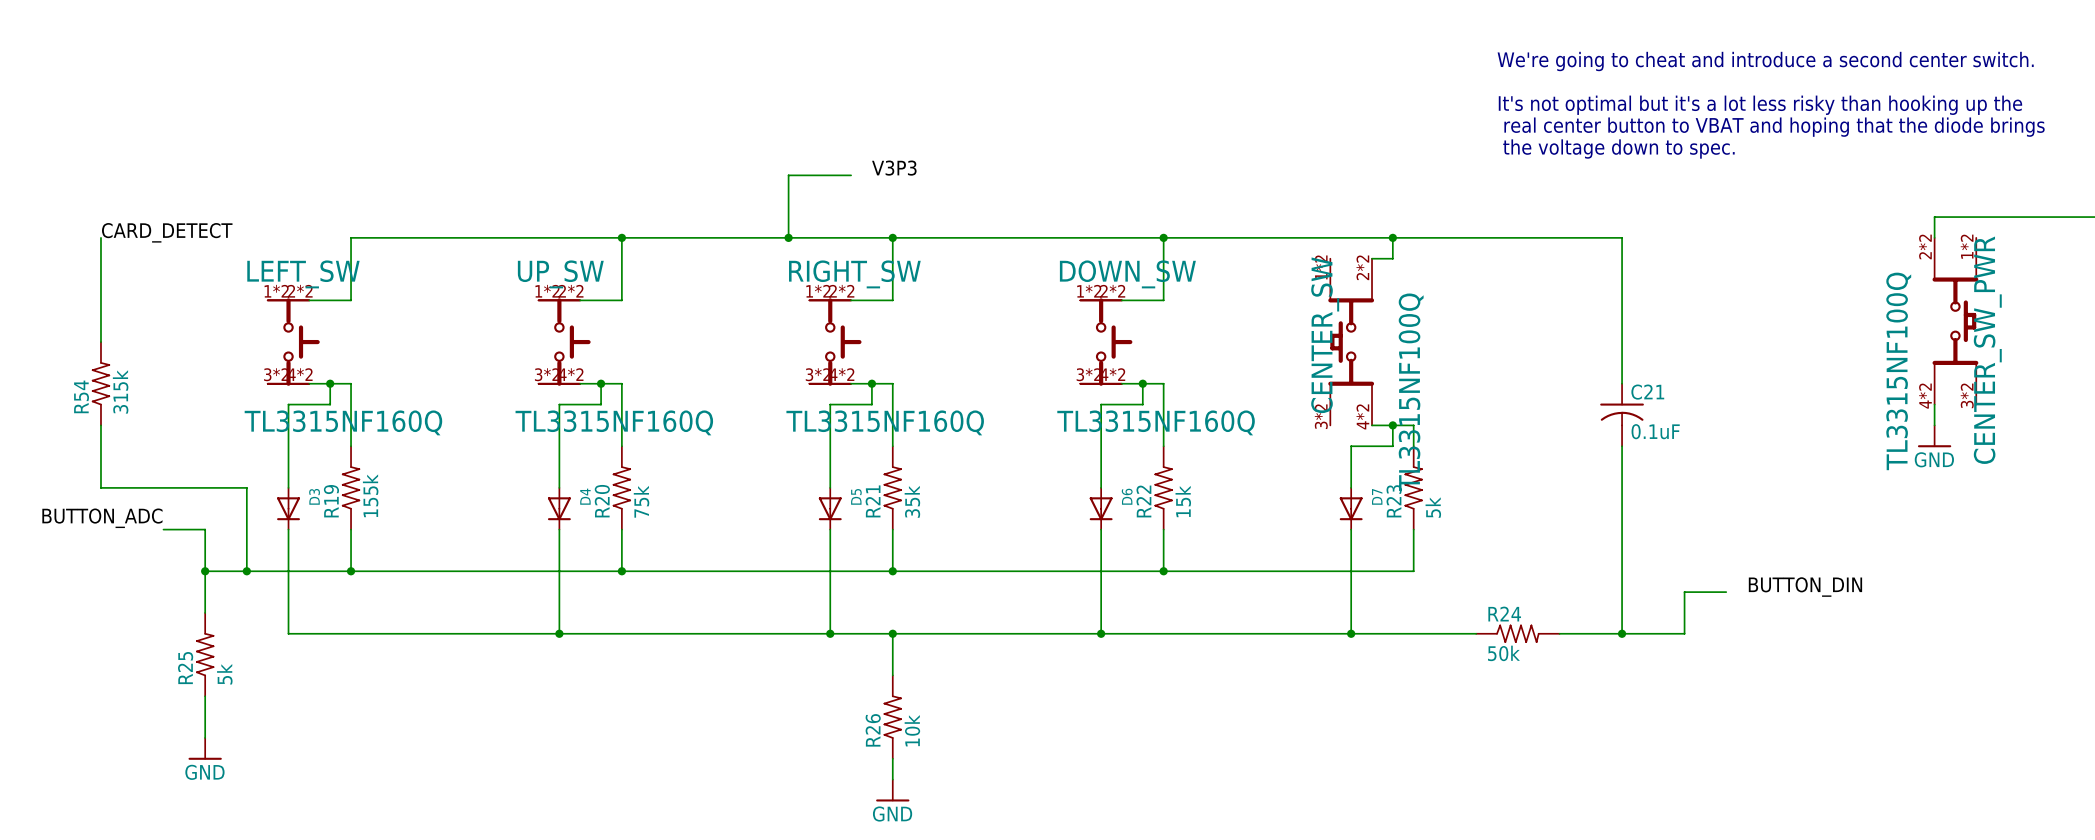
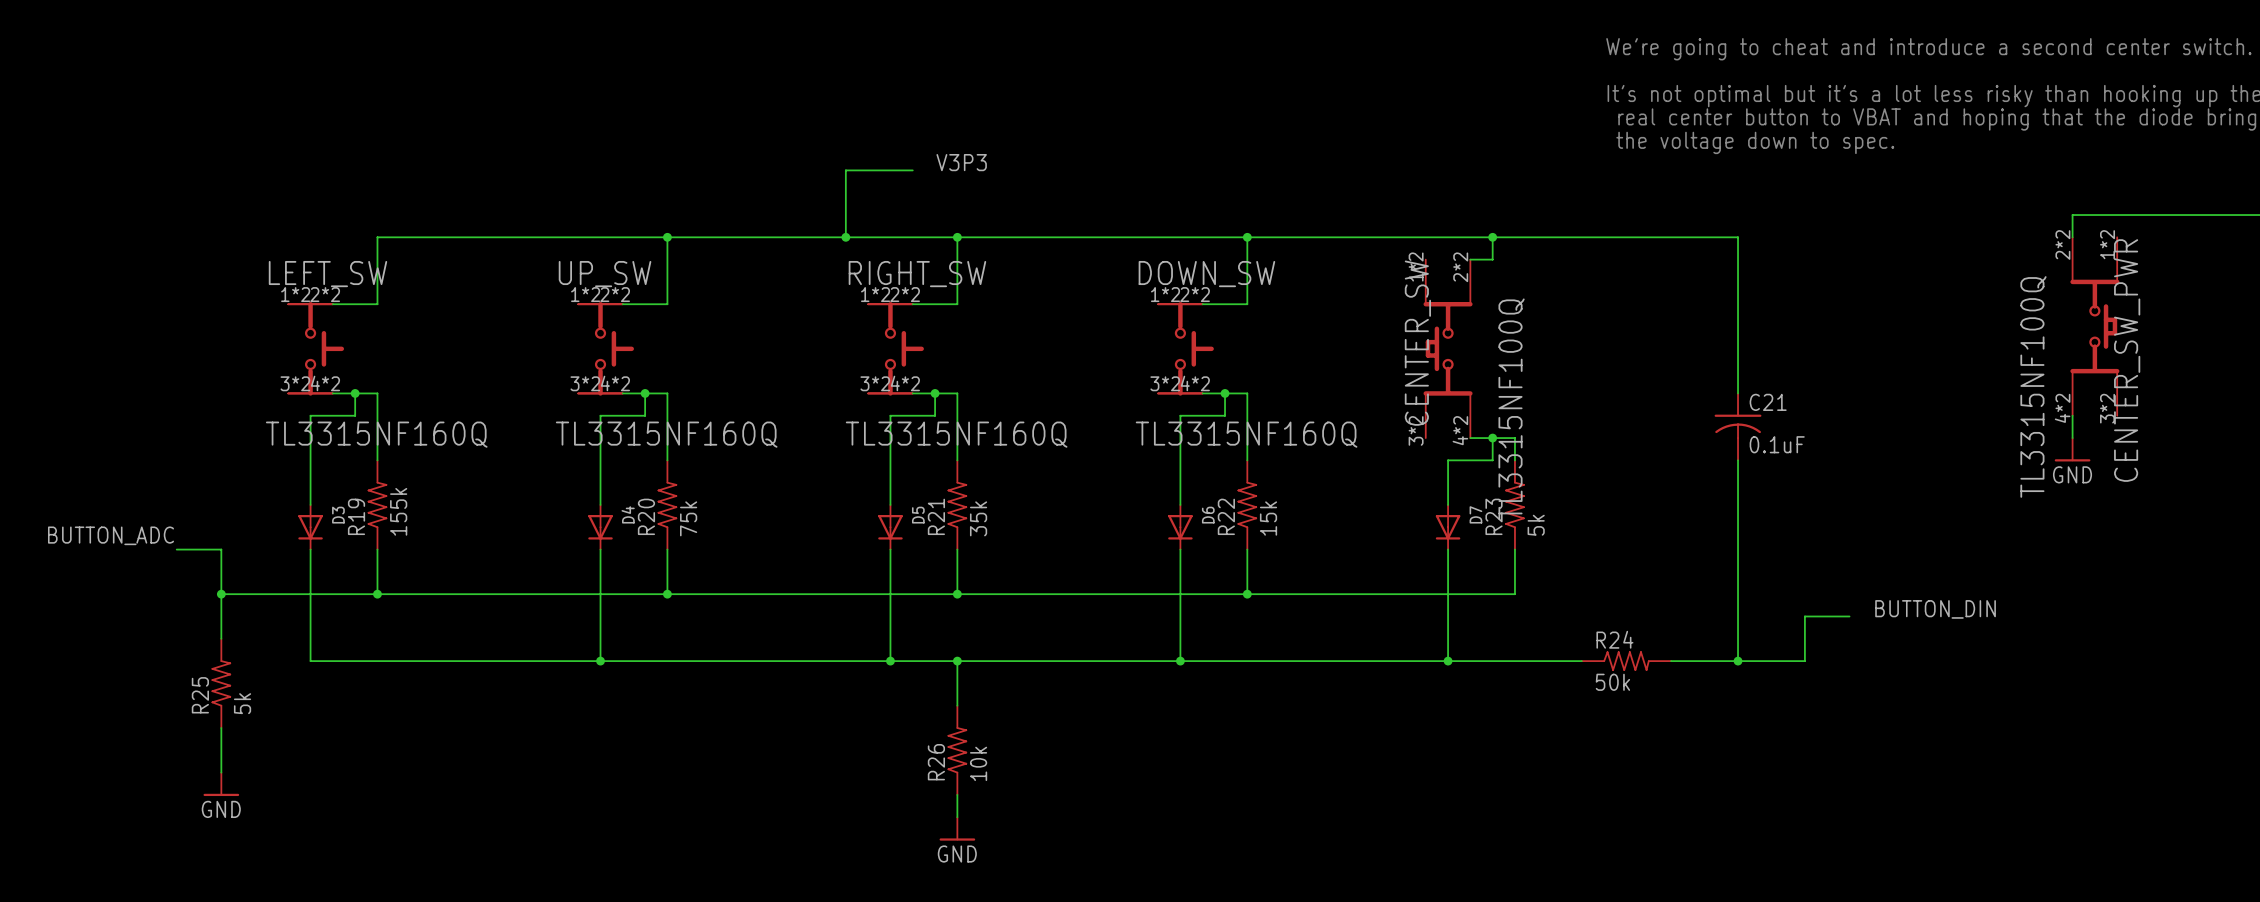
label: CARD_DETECT (167, 232) -> none
wire: (100, 237) (100, 342) -> none
R54: 315k (100, 383) -> none
wire: (100, 425) (100, 487) (246, 487) (246, 571) -> none
junction: (246, 571) -> none

